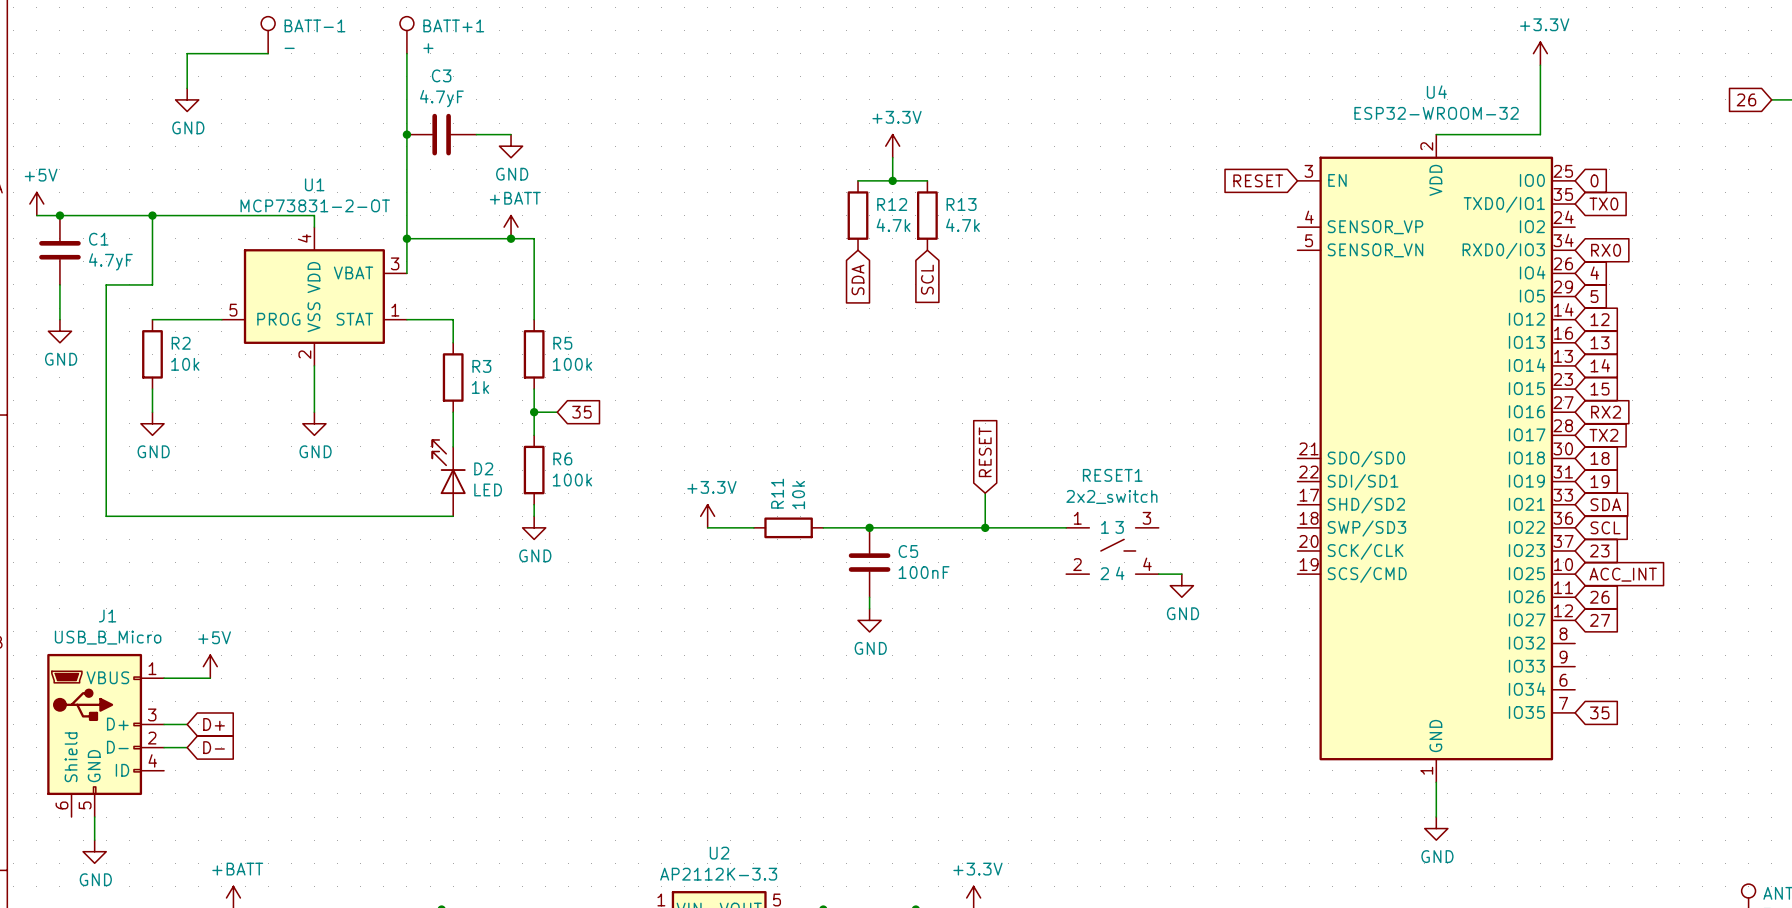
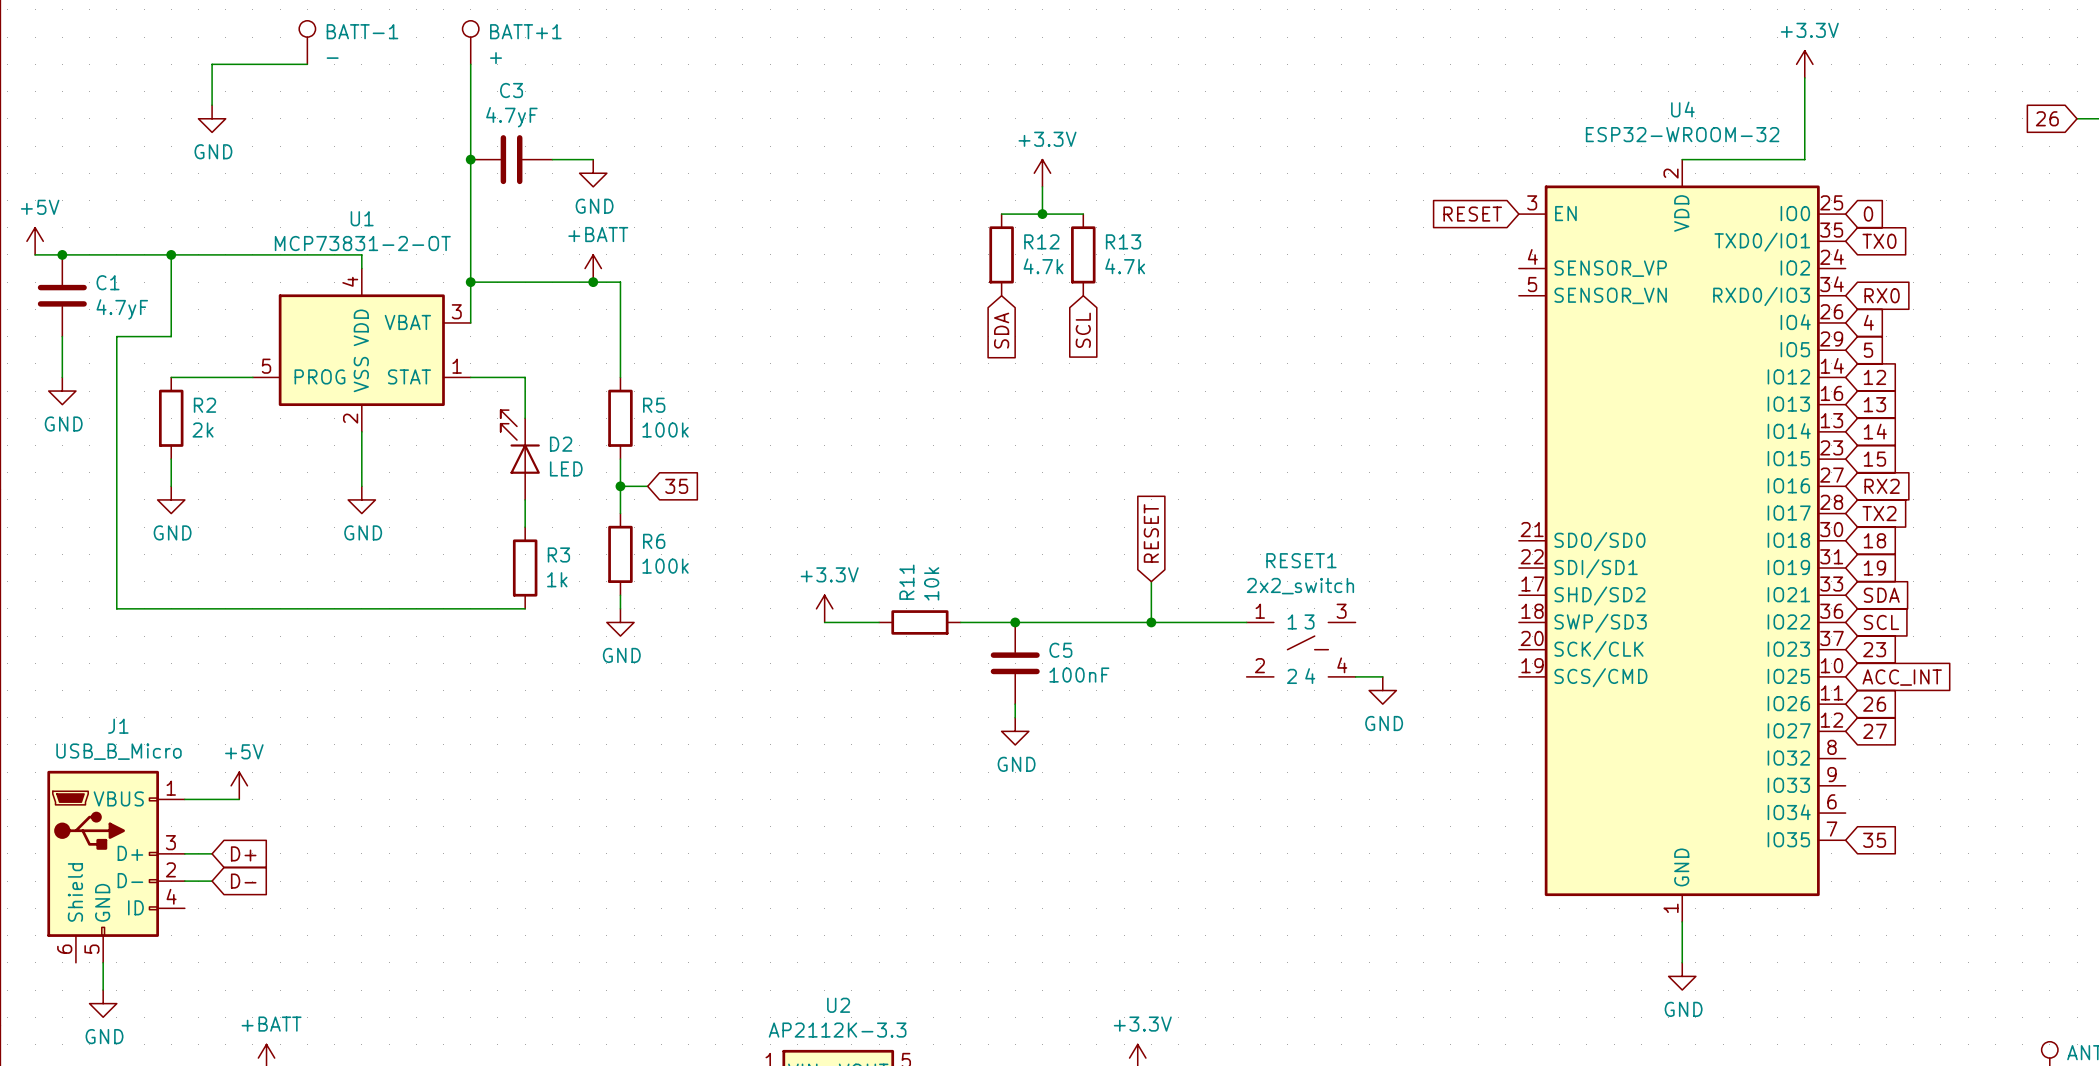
R2 value: 10k (185, 364) -> 2k (203, 430)
R3 position: (453, 377) -> (525, 568)
D2 position: (449, 478) -> (520, 455)

